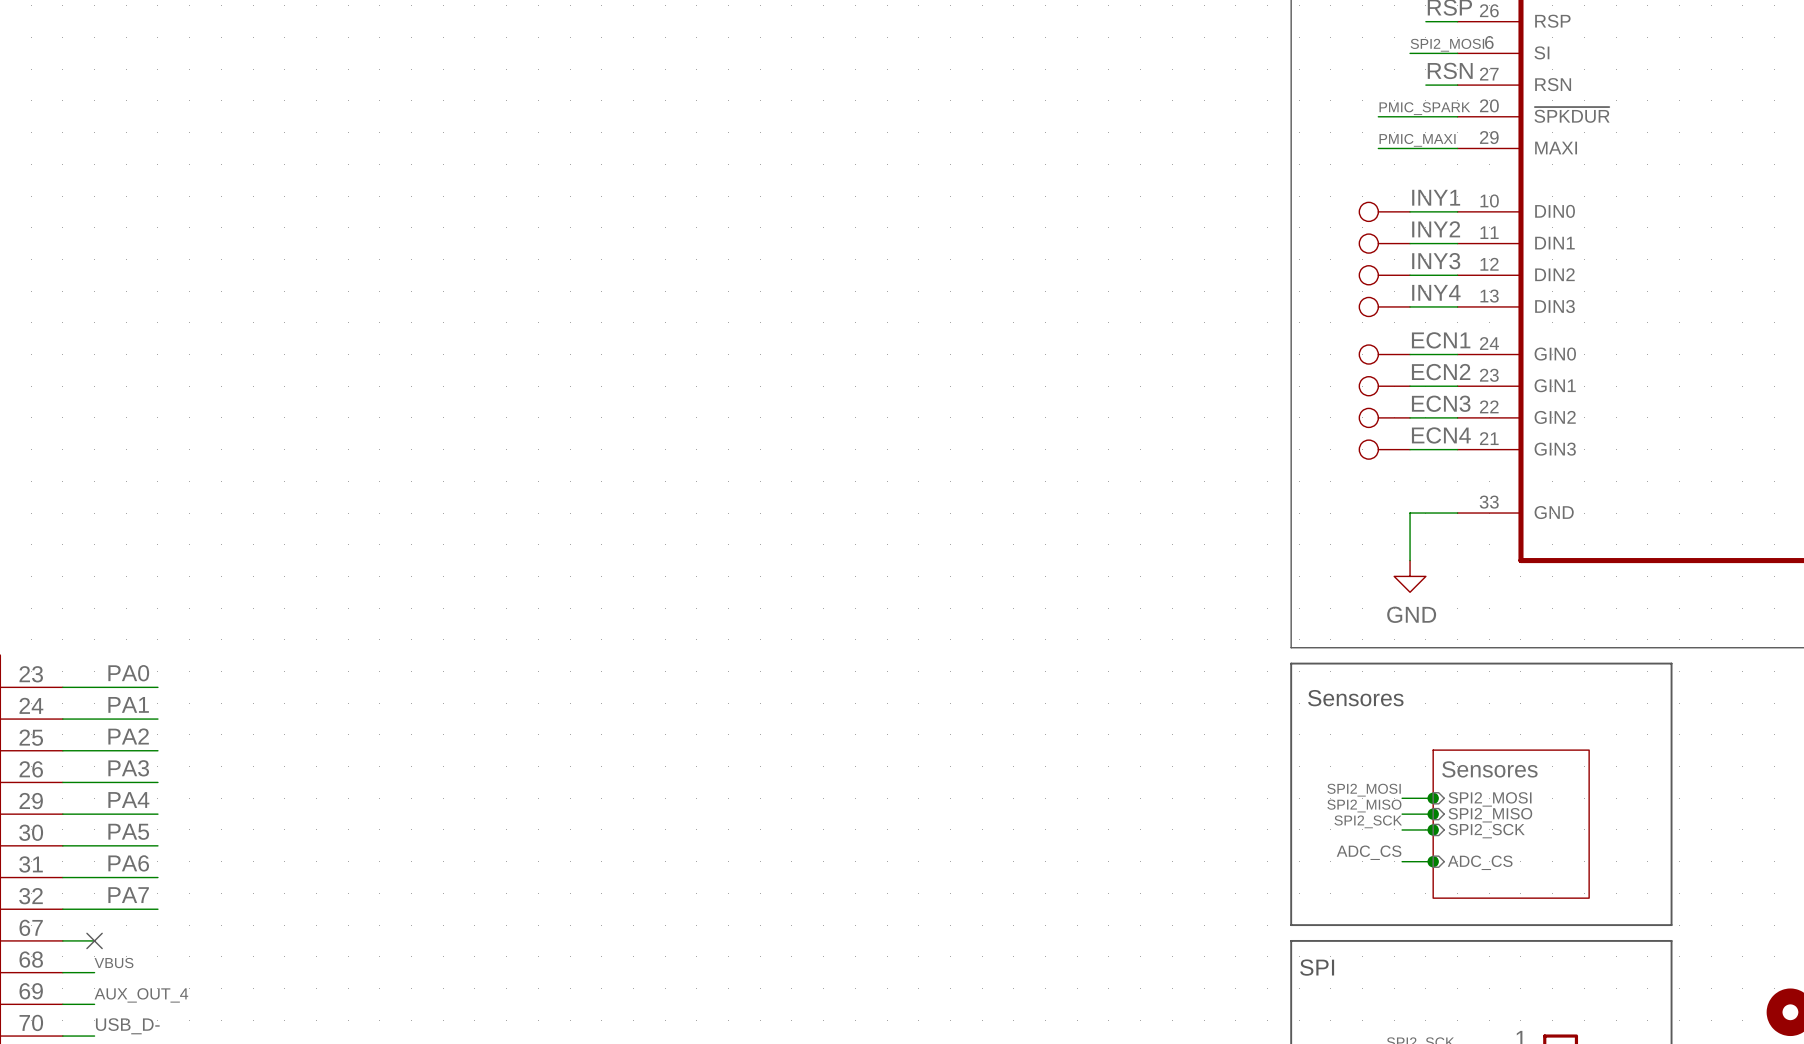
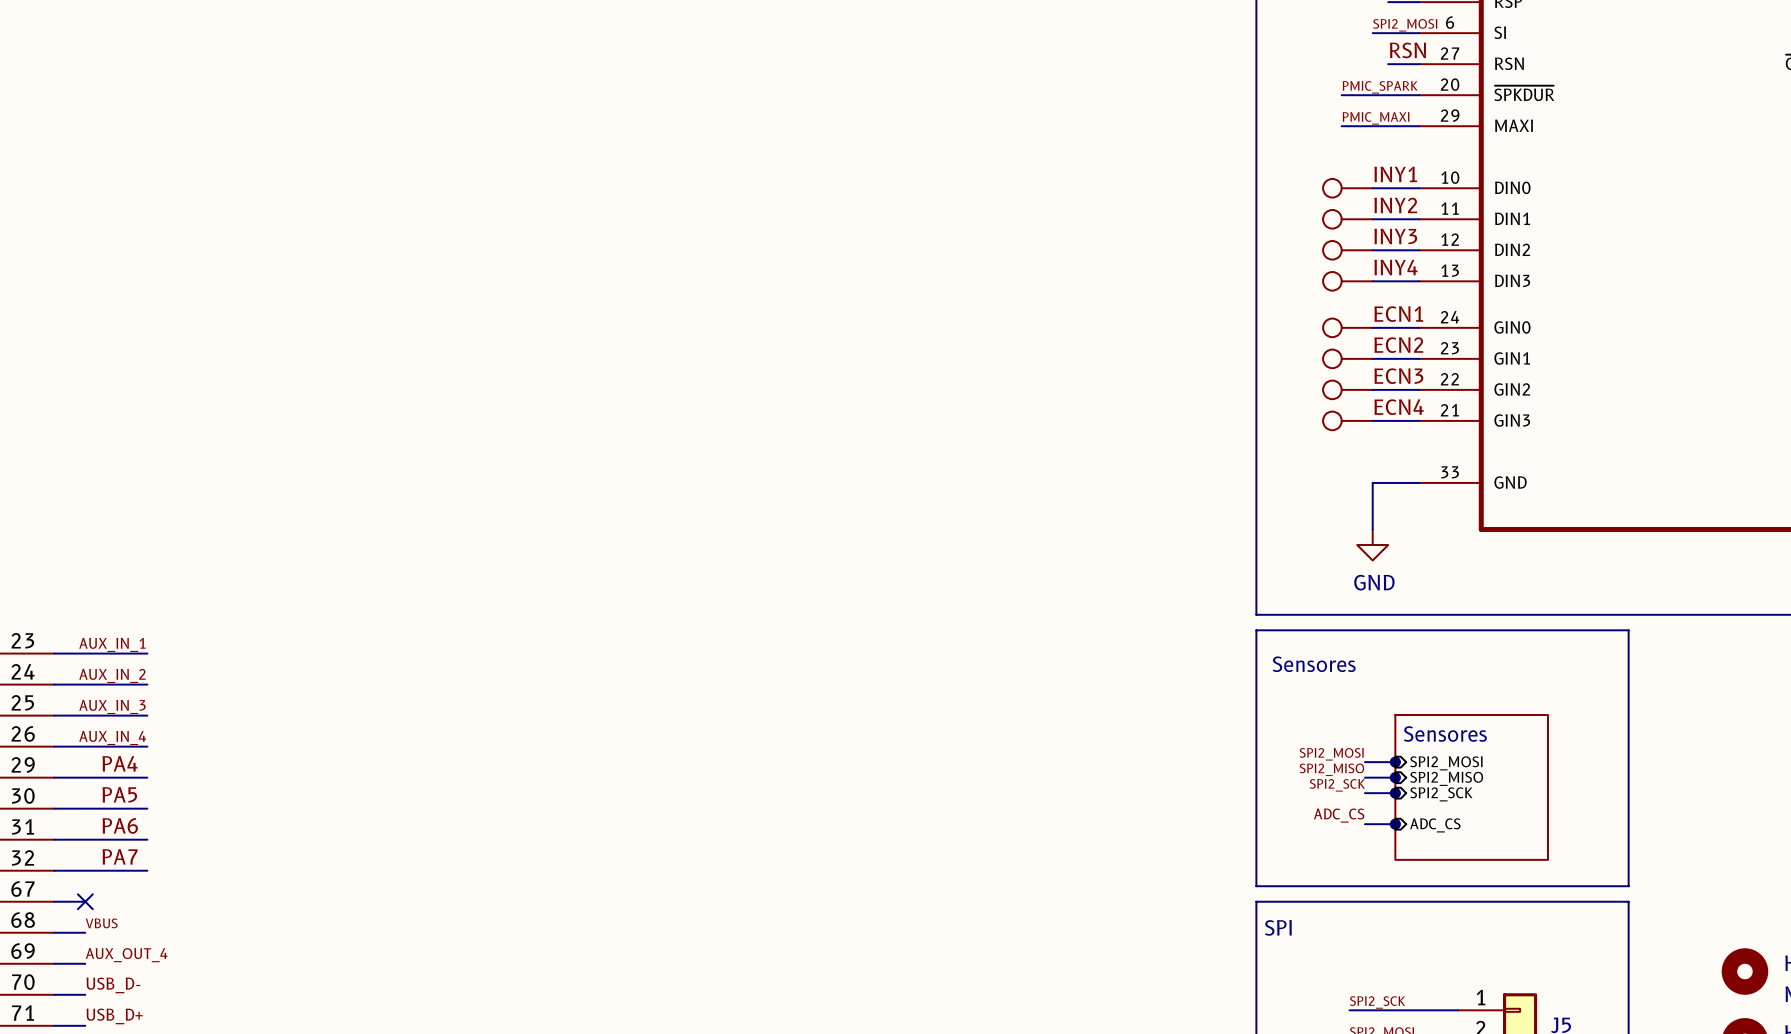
label: PA0 (128, 673) -> AUX_IN_1 (112, 644)
label: PA1 (128, 704) -> AUX_IN_2 (112, 675)
label: PA2 (128, 736) -> AUX_IN_3 (112, 706)
label: PA3 (128, 768) -> AUX_IN_4 (112, 738)

